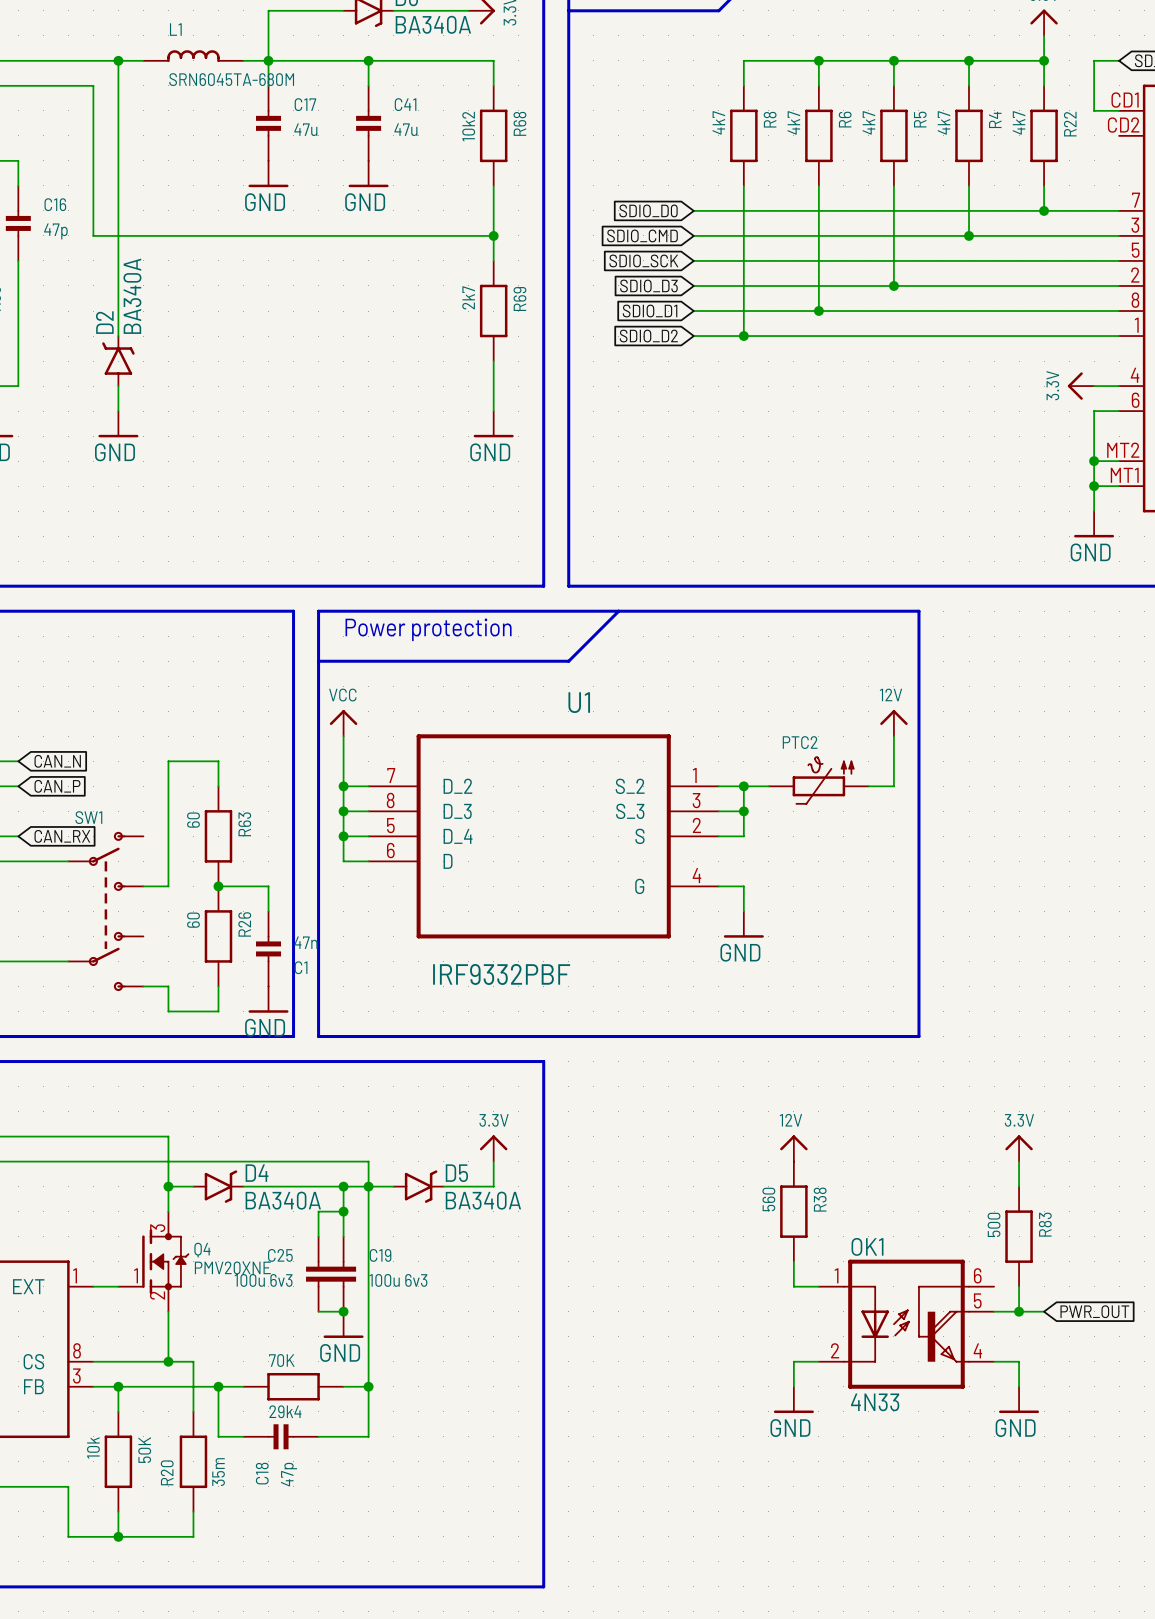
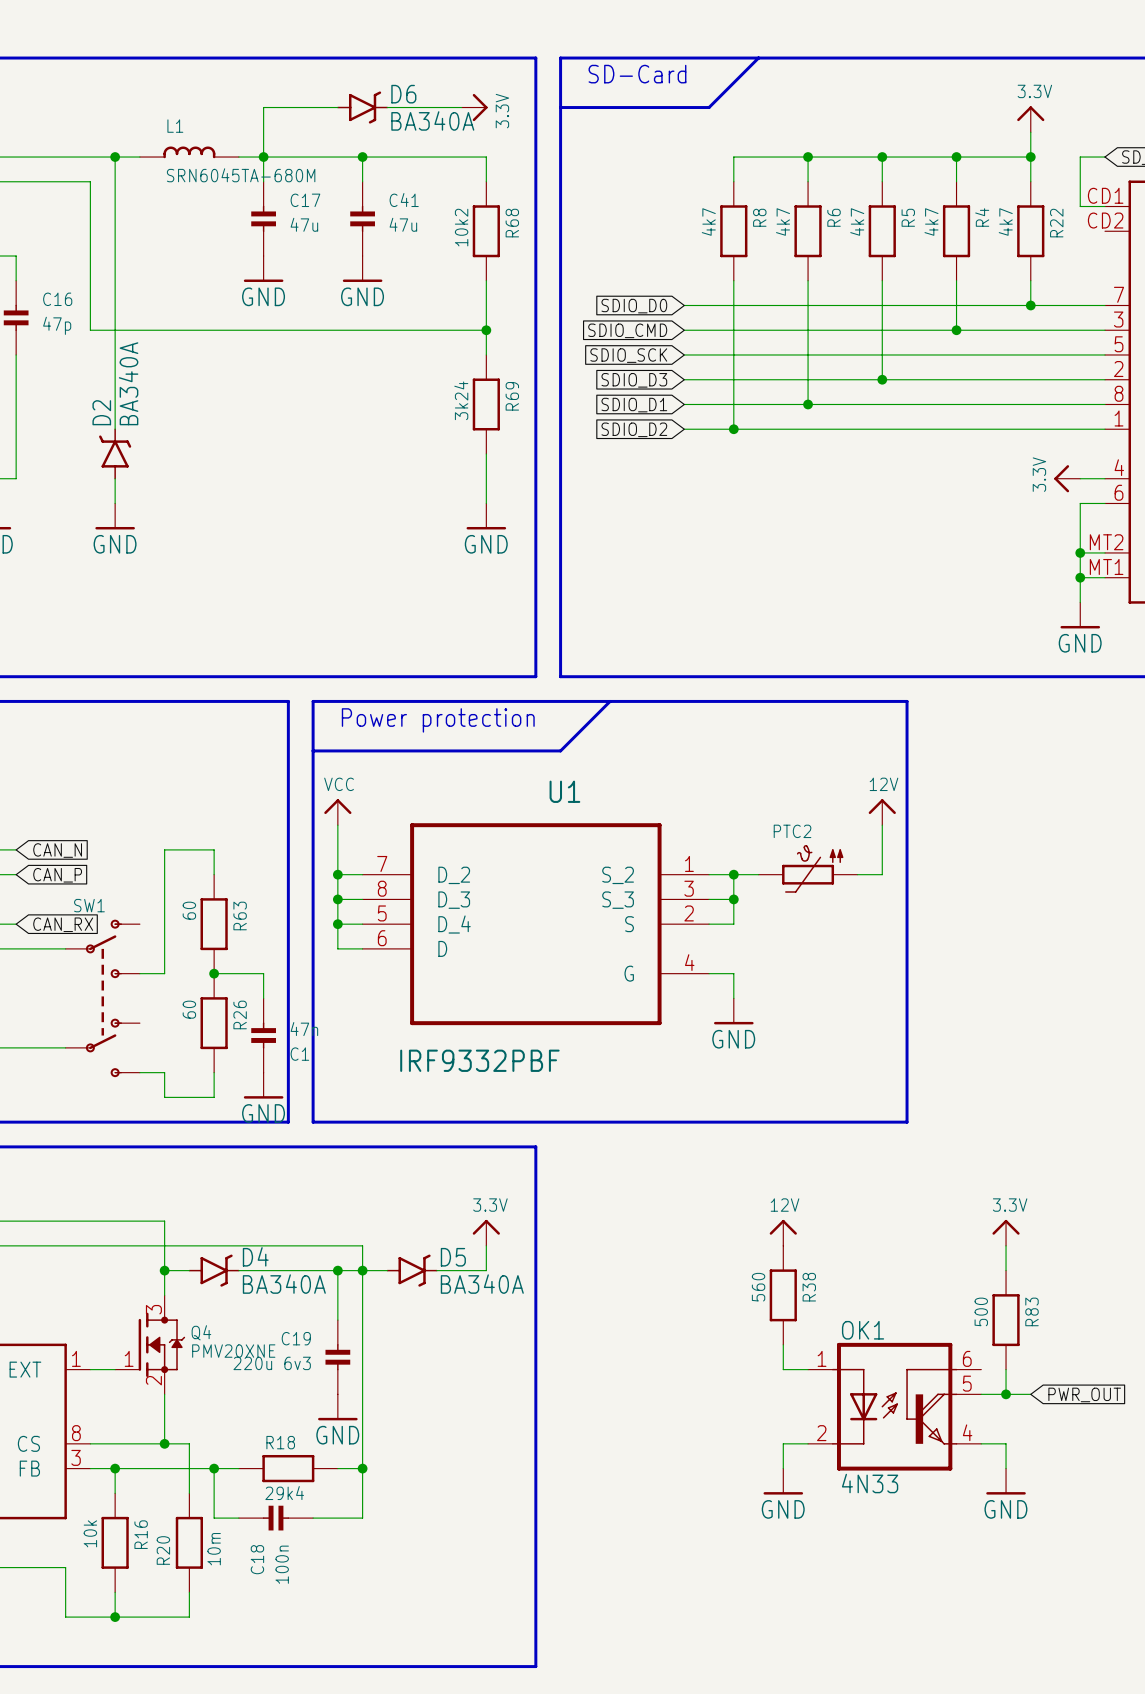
R69 value: 2k7 (468, 297) -> 3k24 (461, 400)
wire: (343, 1211) (318, 1211) (318, 1236) -> none
junction: (343, 1211) -> none
C19 name position: C19 (380, 1255) -> C19 (296, 1338)
C25: 100u 6v3 (318, 1274) -> none
C19 value: 100u 6v3 (398, 1280) -> 220u 6v3 (272, 1363)
wire: (318, 1311) (343, 1311) -> none
junction: (343, 1311) -> none
70K name: 70K (281, 1360) -> R18 (280, 1442)
50K name: 50K (144, 1450) -> R16 (141, 1534)
R20 value: 35m (218, 1472) -> 10m (214, 1549)
C18 value: 47p (289, 1474) -> 100n (282, 1564)

